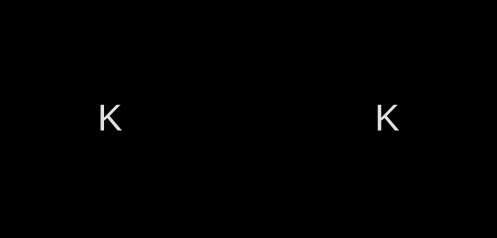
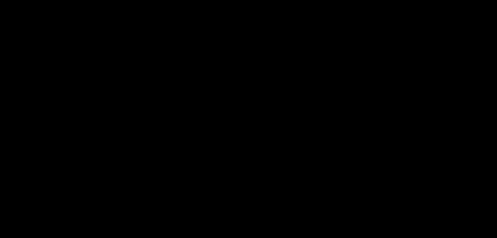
text: K (111, 117) -> none
text: K (388, 117) -> none

